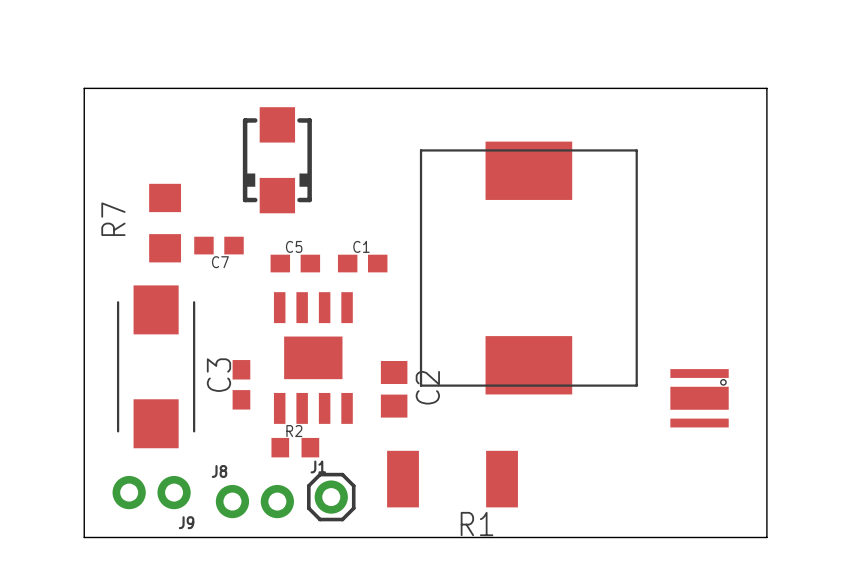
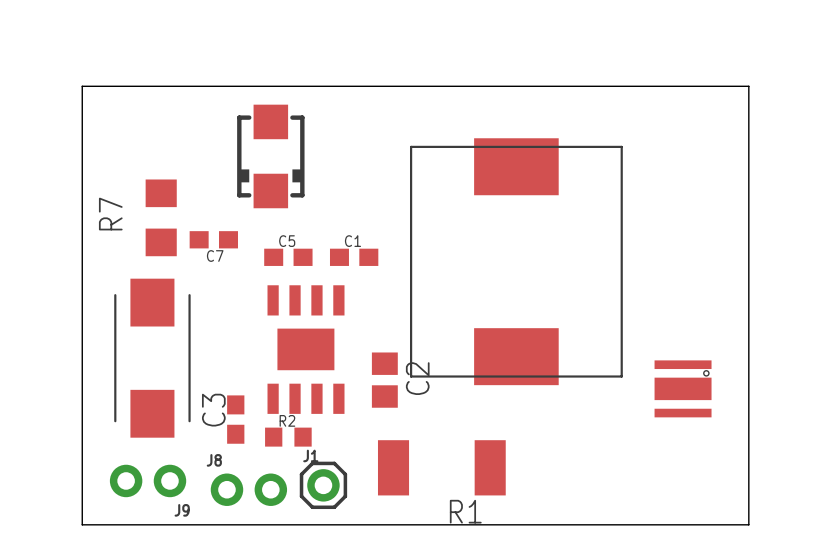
C3 position: (241, 384) -> (235, 419)

